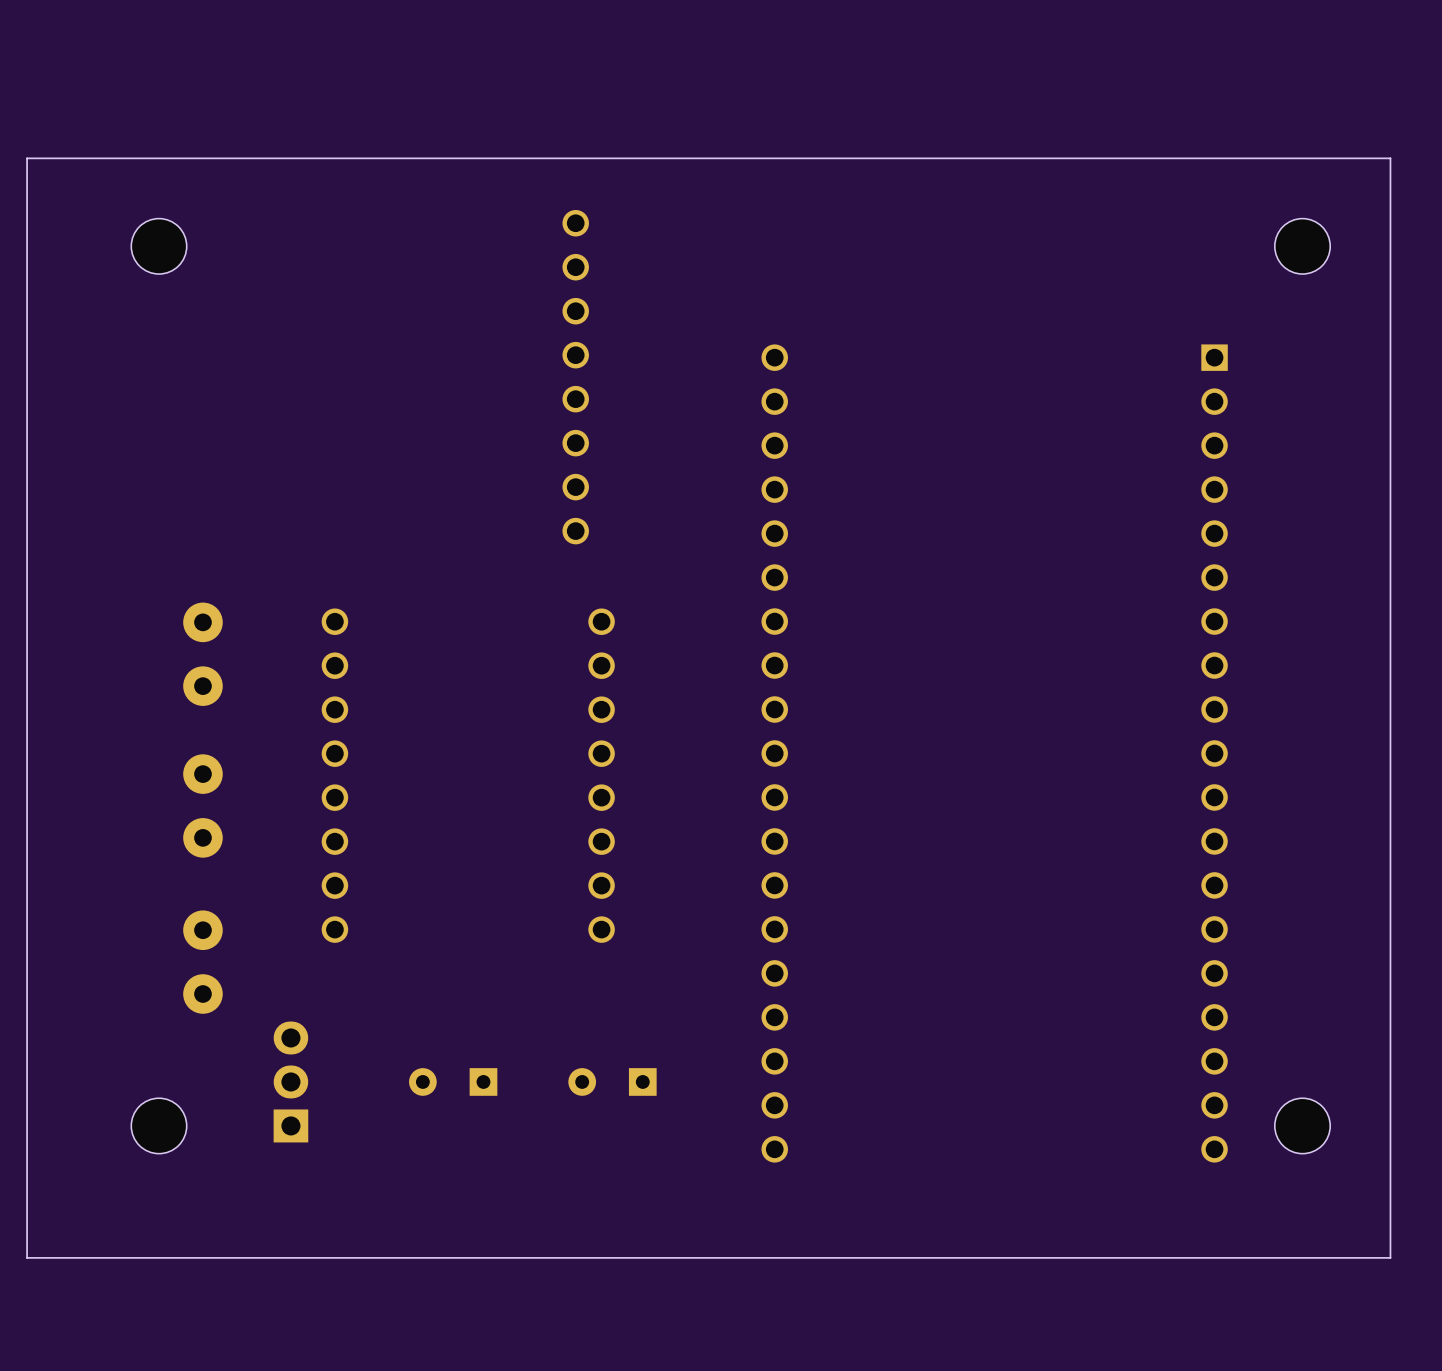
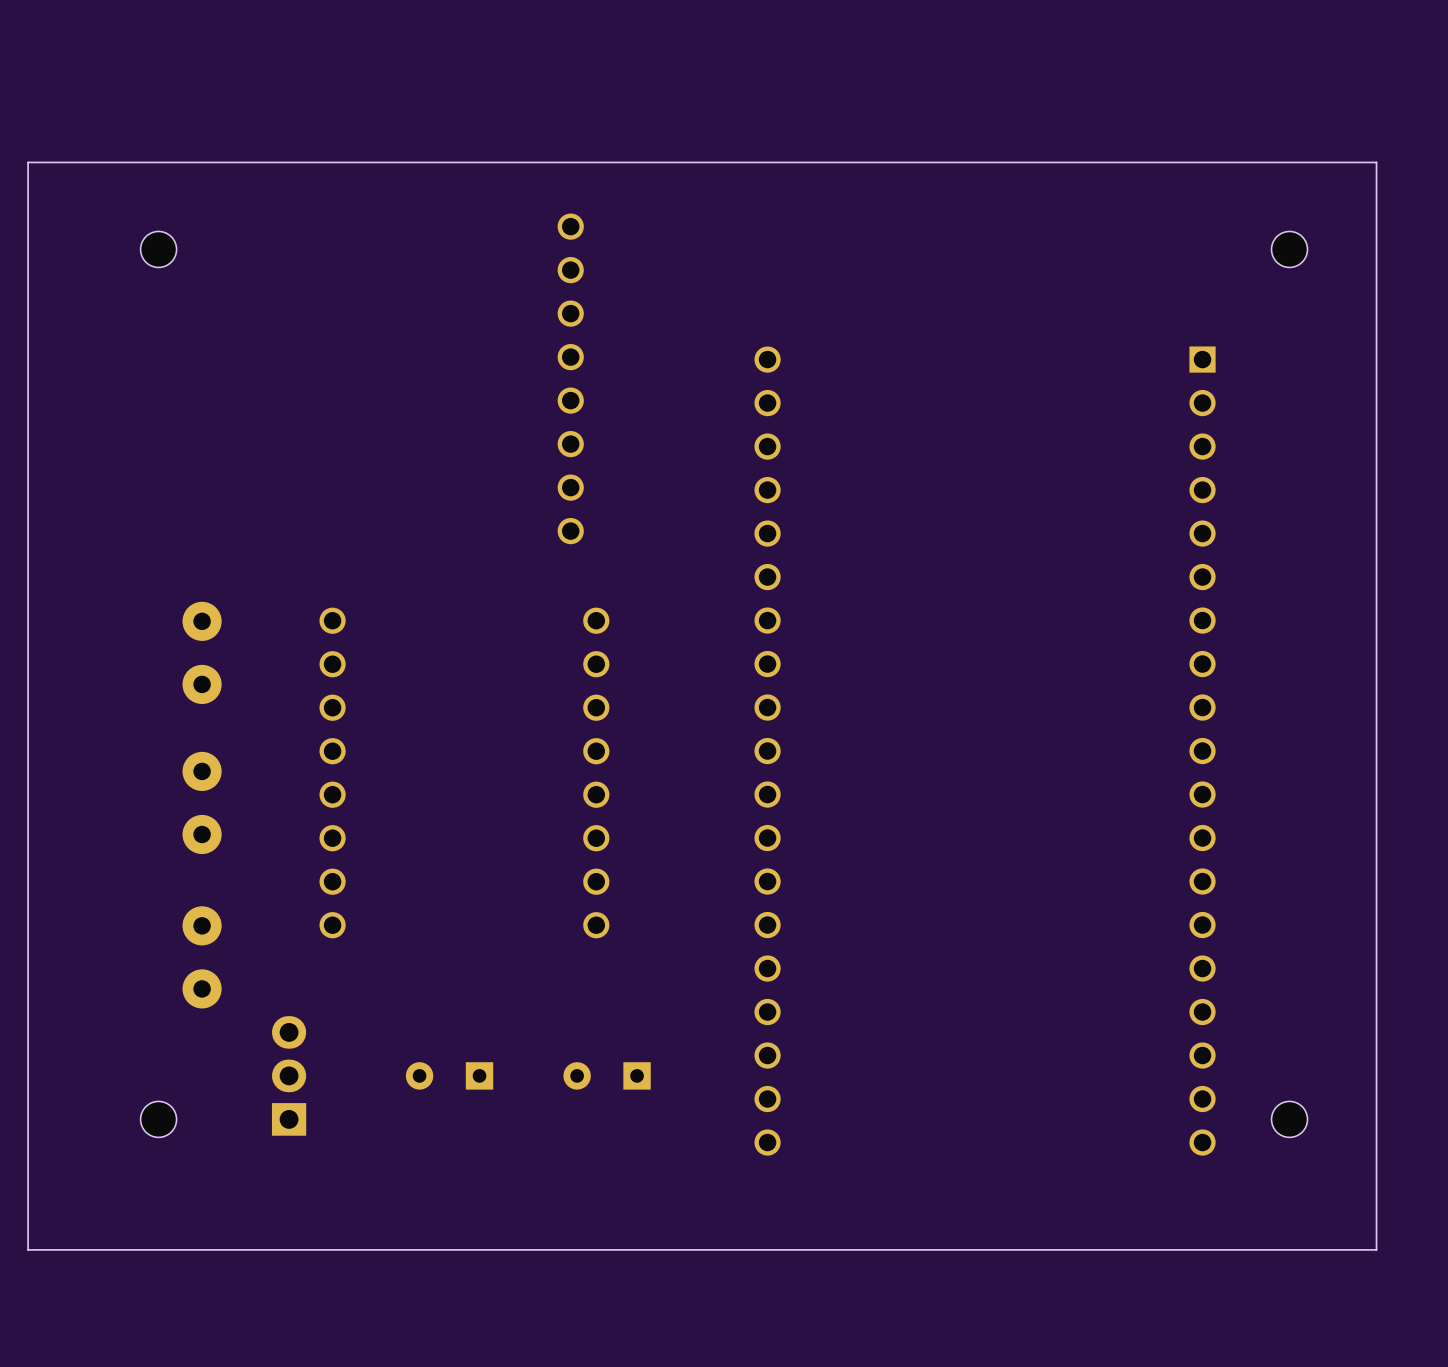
part footprint: [131, 218, 187, 275] -> [140, 231, 177, 268]
part footprint: [1274, 218, 1331, 275] -> [1271, 231, 1308, 268]
part footprint: [131, 1098, 187, 1154] -> [140, 1101, 177, 1138]
part footprint: [1274, 1098, 1331, 1154] -> [1271, 1101, 1308, 1138]

